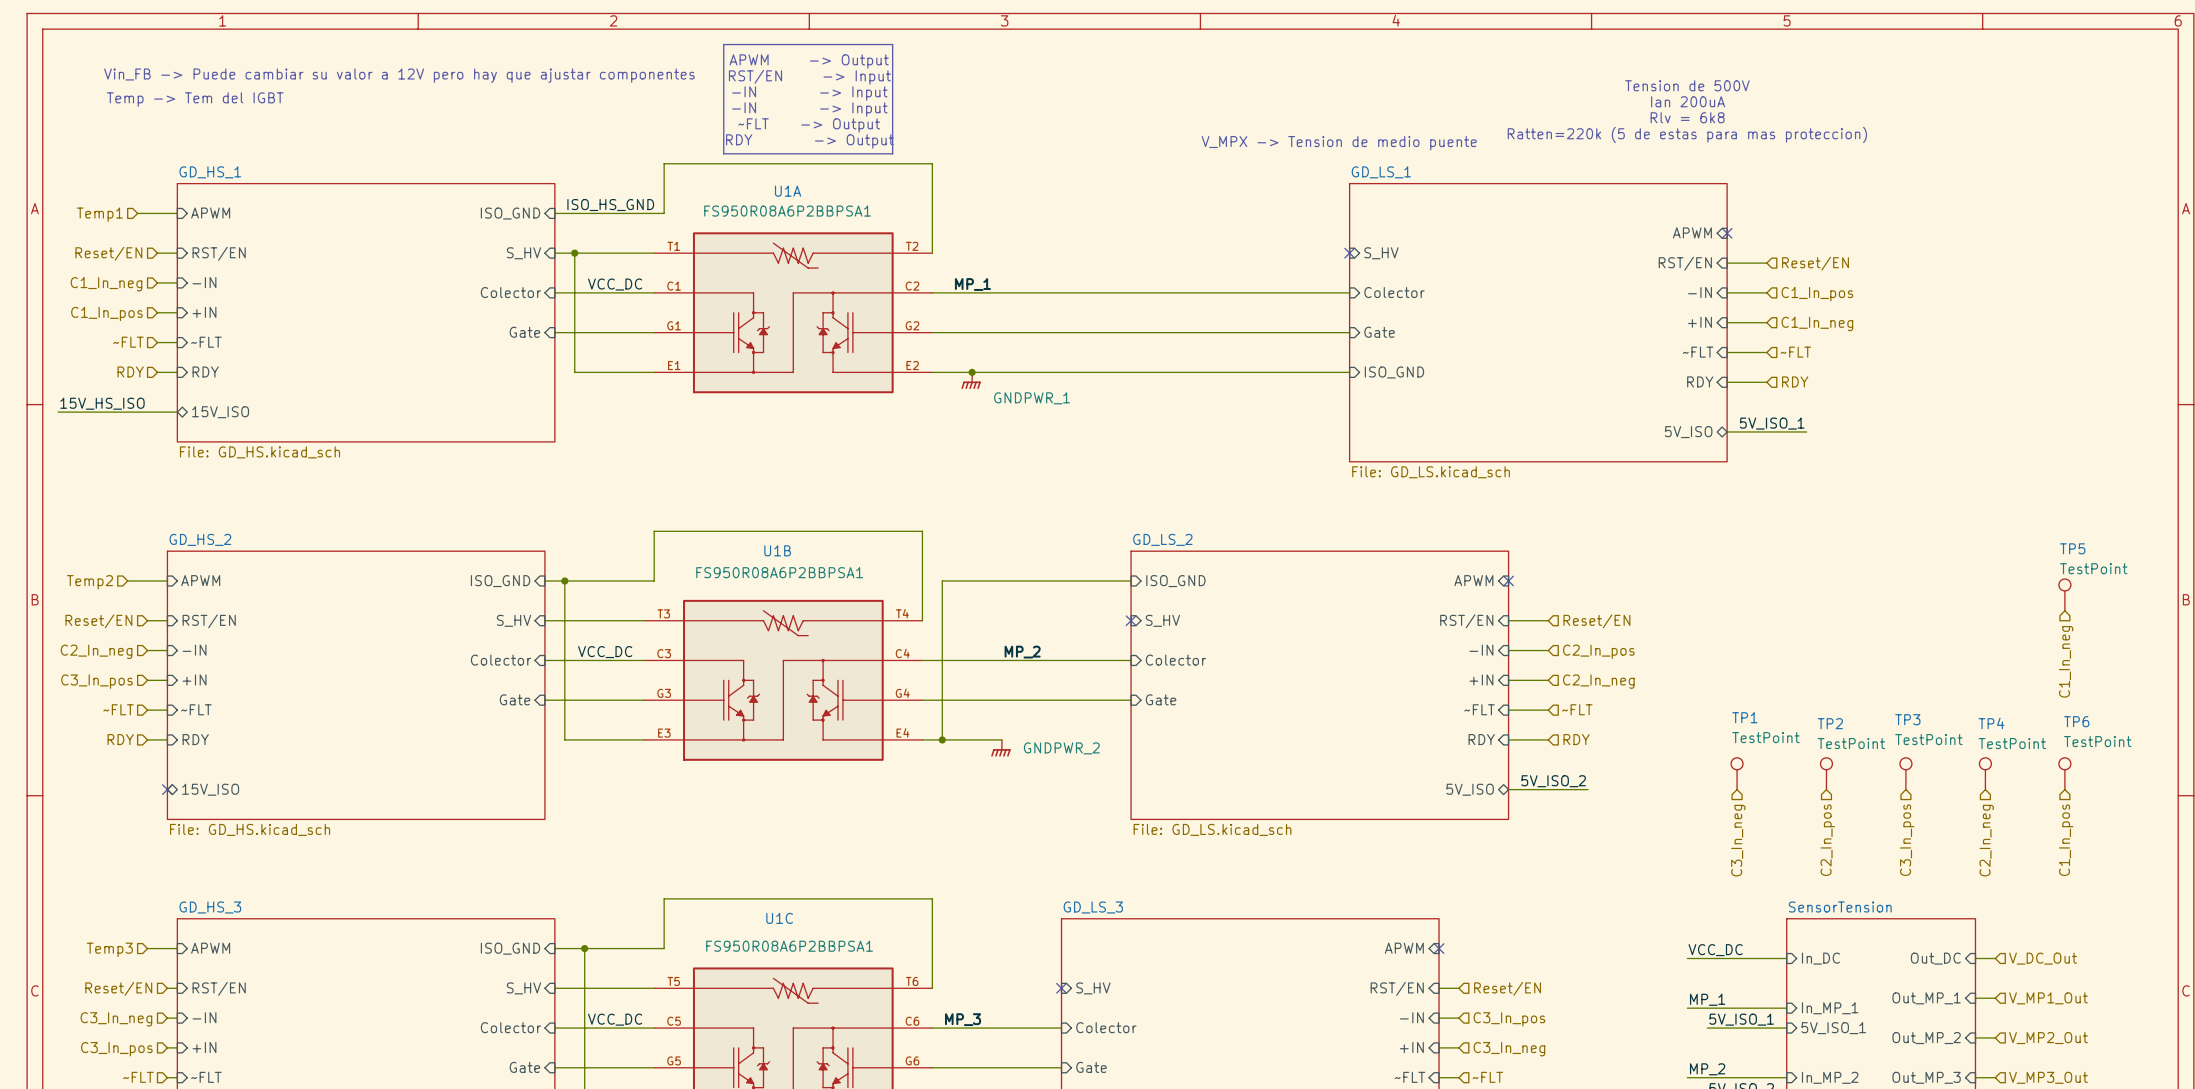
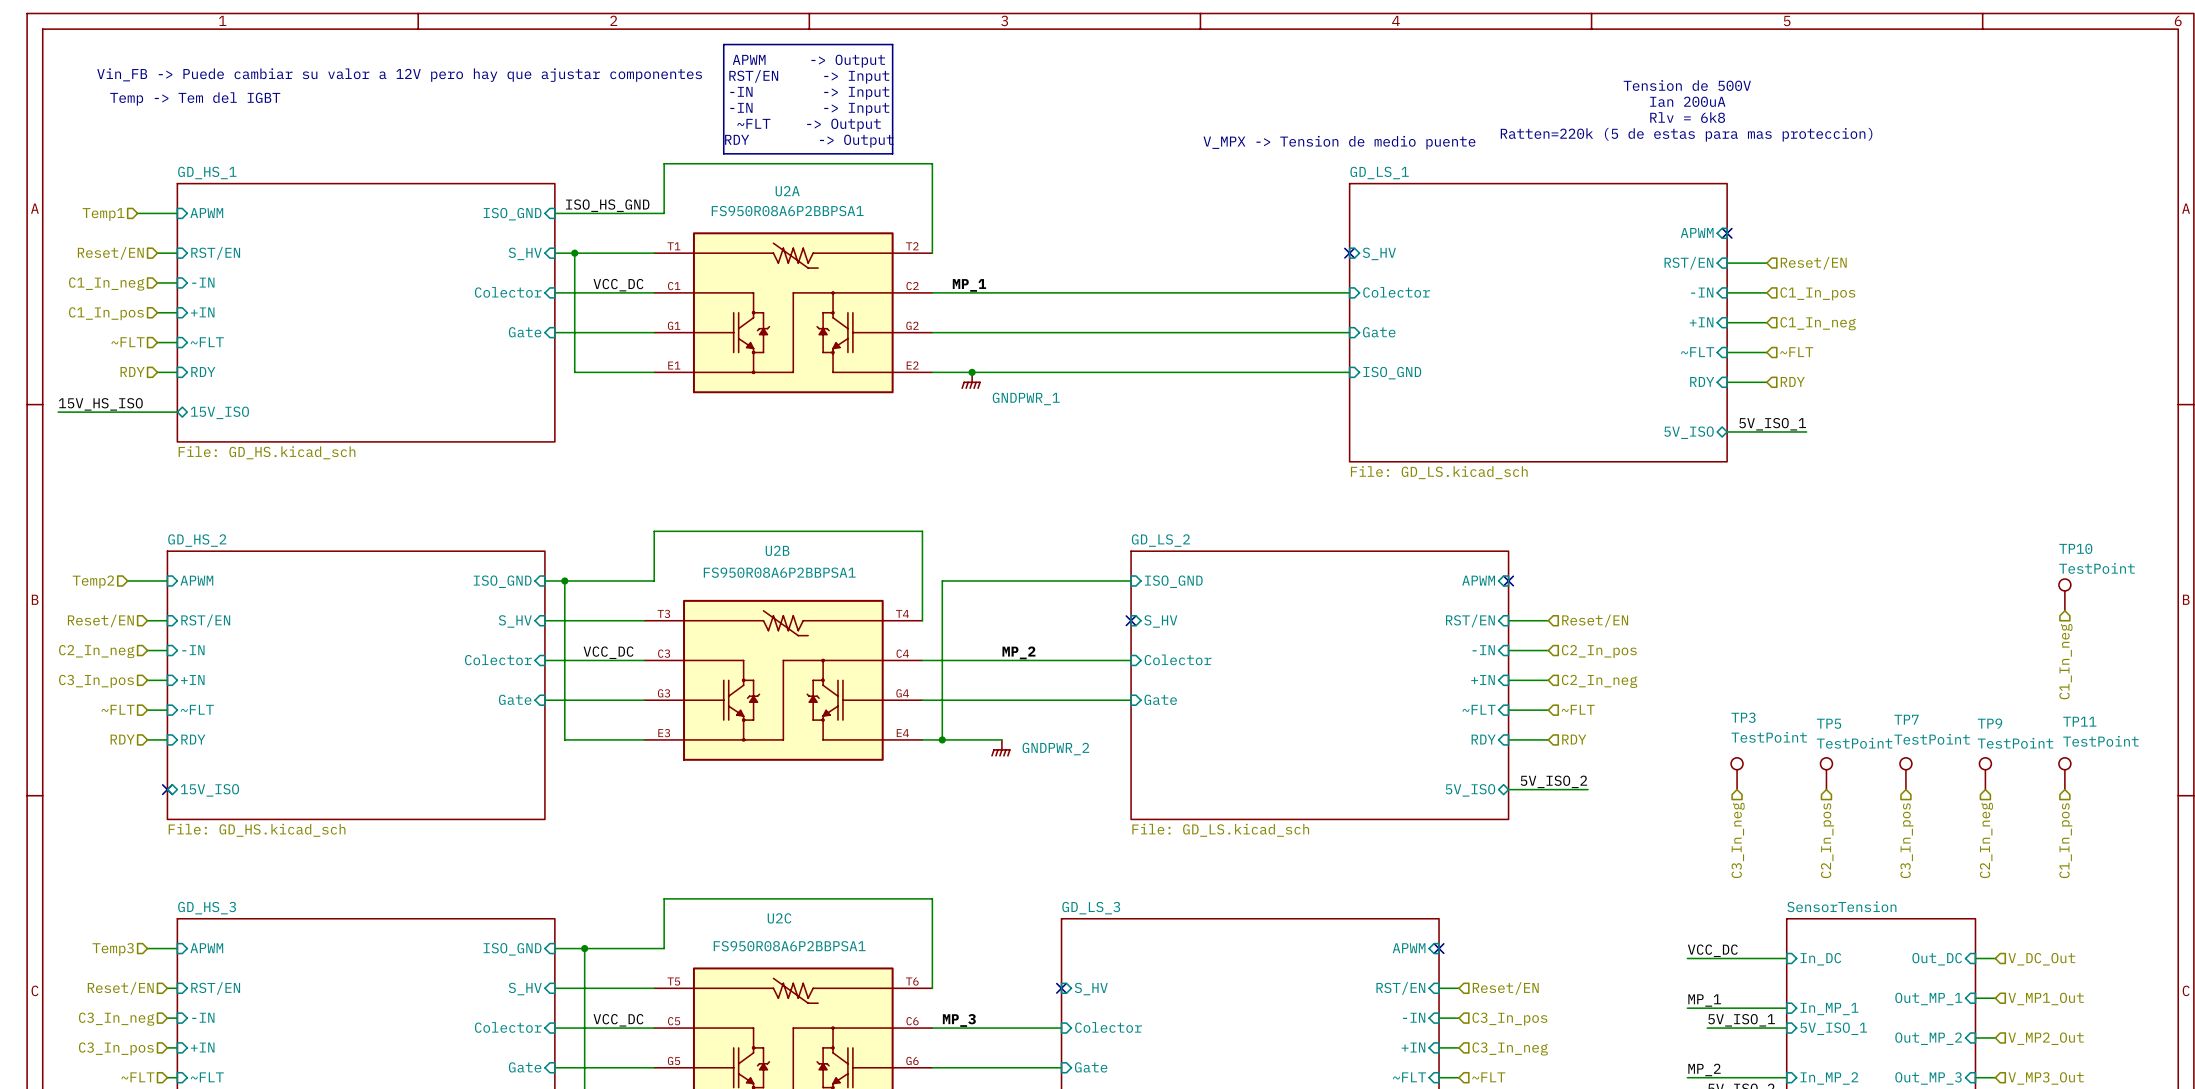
U1A name: U1A (788, 191) -> U2A (787, 191)
TP5 name: TP5 (2072, 548) -> TP10 (2075, 548)
U1B name: U1B (777, 550) -> U2B (777, 550)
TP1 name: TP1 (1744, 717) -> TP3 (1743, 717)
TP3 name: TP3 (1907, 719) -> TP7 (1906, 719)
TP6 name: TP6 (2076, 721) -> TP11 (2079, 721)
TP2 name: TP2 (1830, 723) -> TP5 (1829, 723)
TP4 name: TP4 (1991, 723) -> TP9 (1989, 723)
U1C name: U1C (779, 918) -> U2C (779, 918)

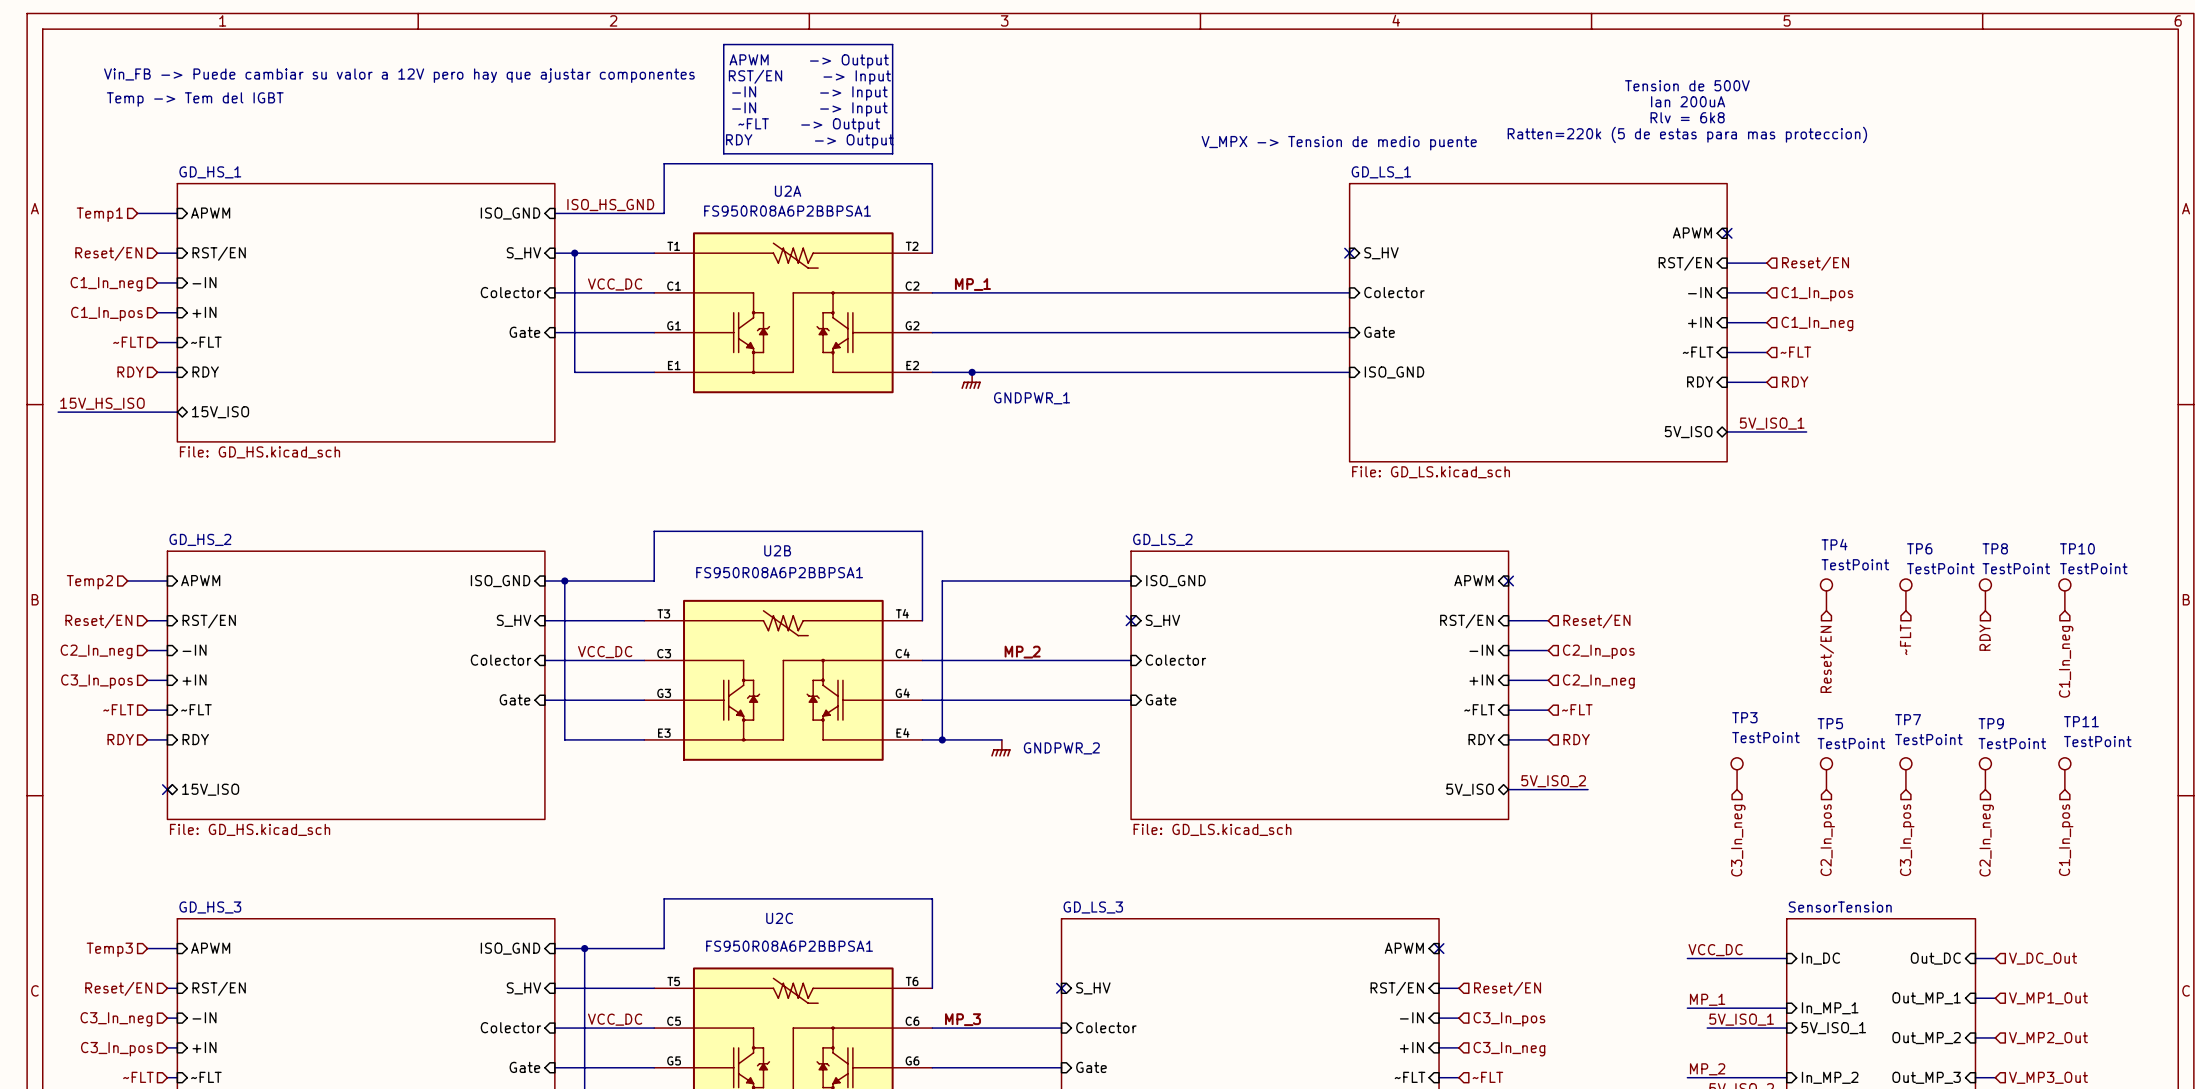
TP4: none -> TestPoint (1826, 594)
TP6: none -> TestPoint (1905, 594)
TP8: none -> TestPoint (1985, 594)
hierarchical label: none -> RDY (1985, 637)
hierarchical label: none -> ~FLT (1905, 639)
hierarchical label: none -> Reset/EN (1827, 659)

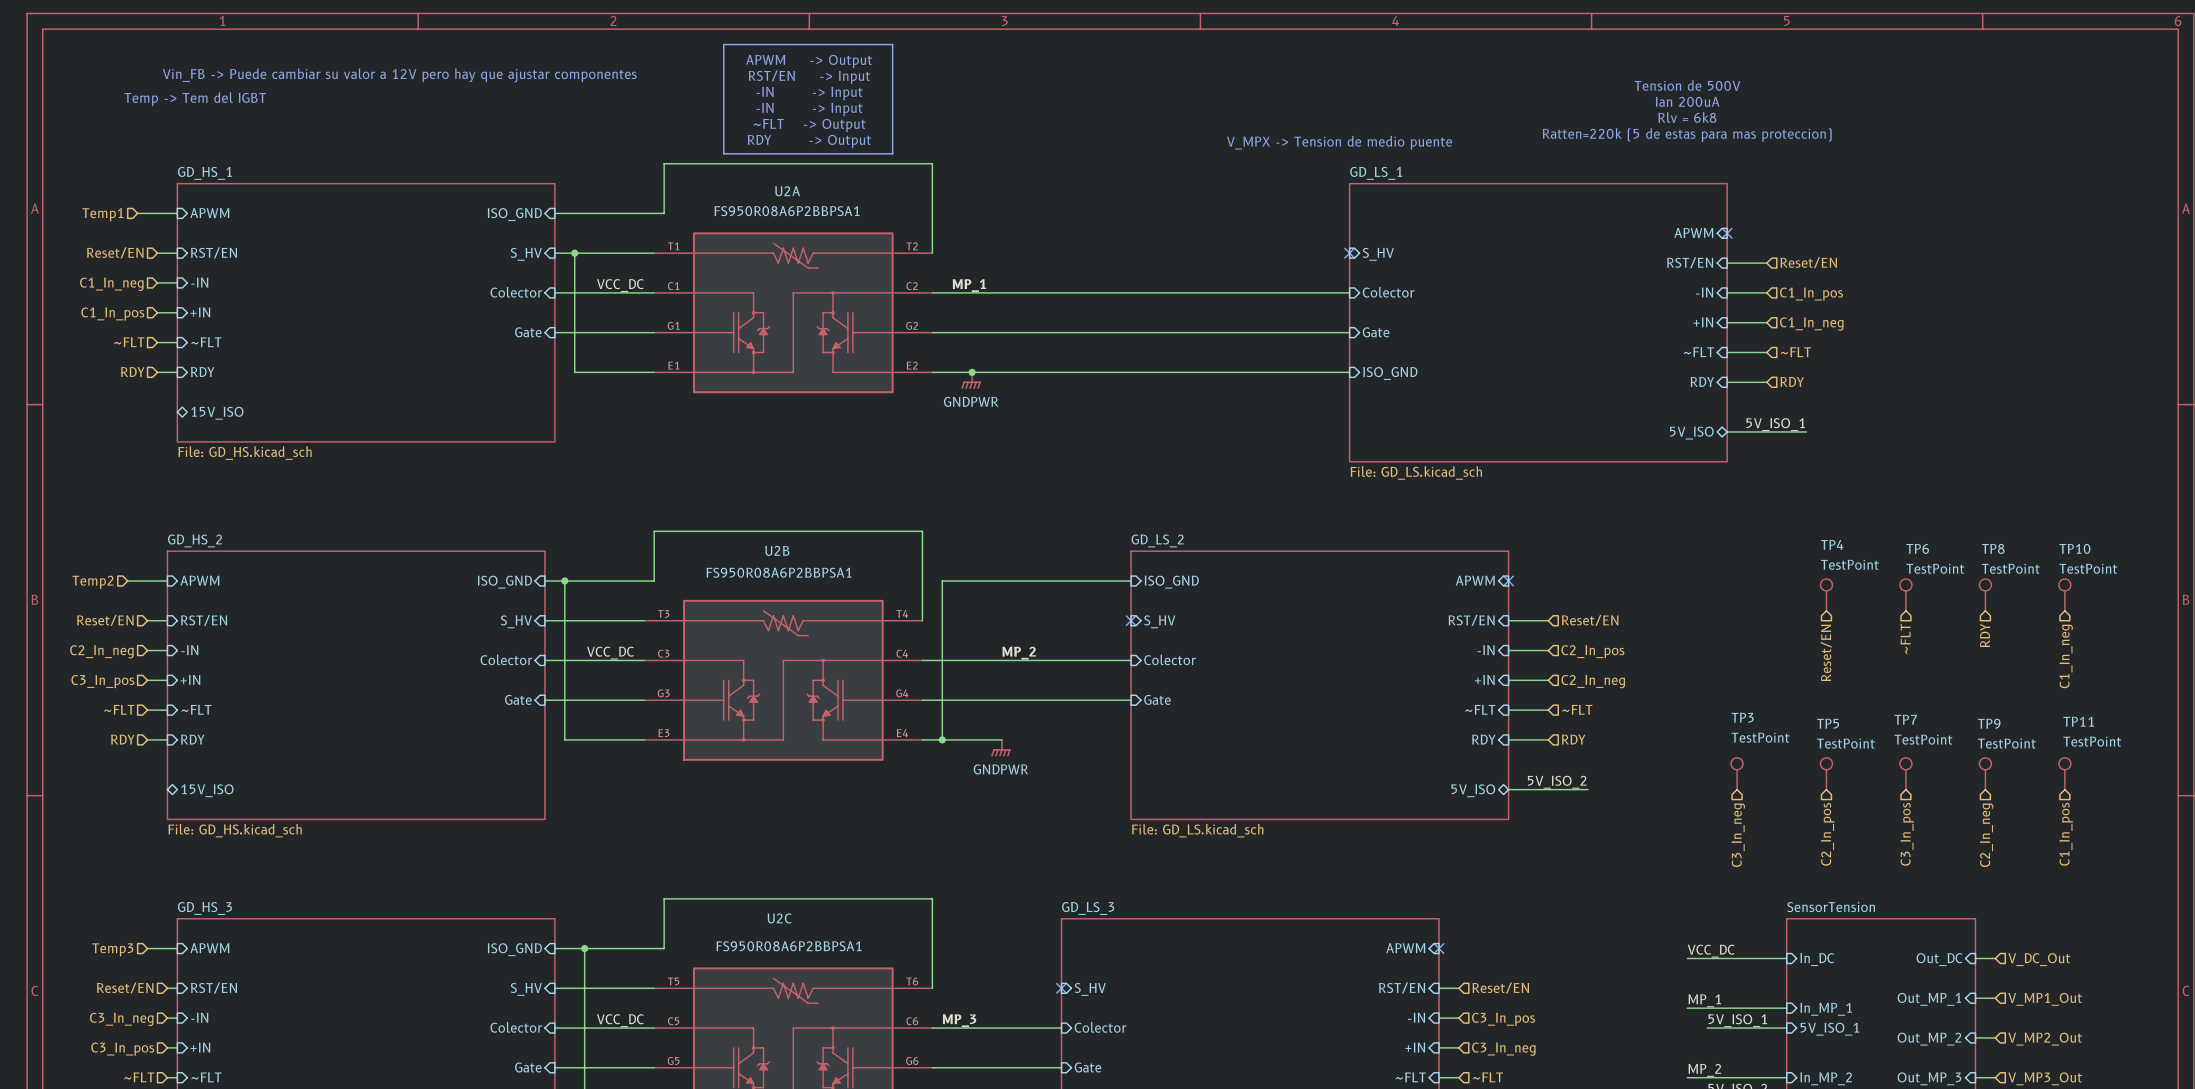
label: ISO_HS_GND (610, 205) -> none
power symbol: GNDPWR_1 (971, 380) -> GNDPWR (971, 380)
label: 15V_HS_ISO (102, 403) -> none
wire: (58, 412) (177, 412) -> none
power symbol: GNDPWR_2 (1000, 748) -> GNDPWR (1000, 748)
no-connect mark: (167, 789) -> none

